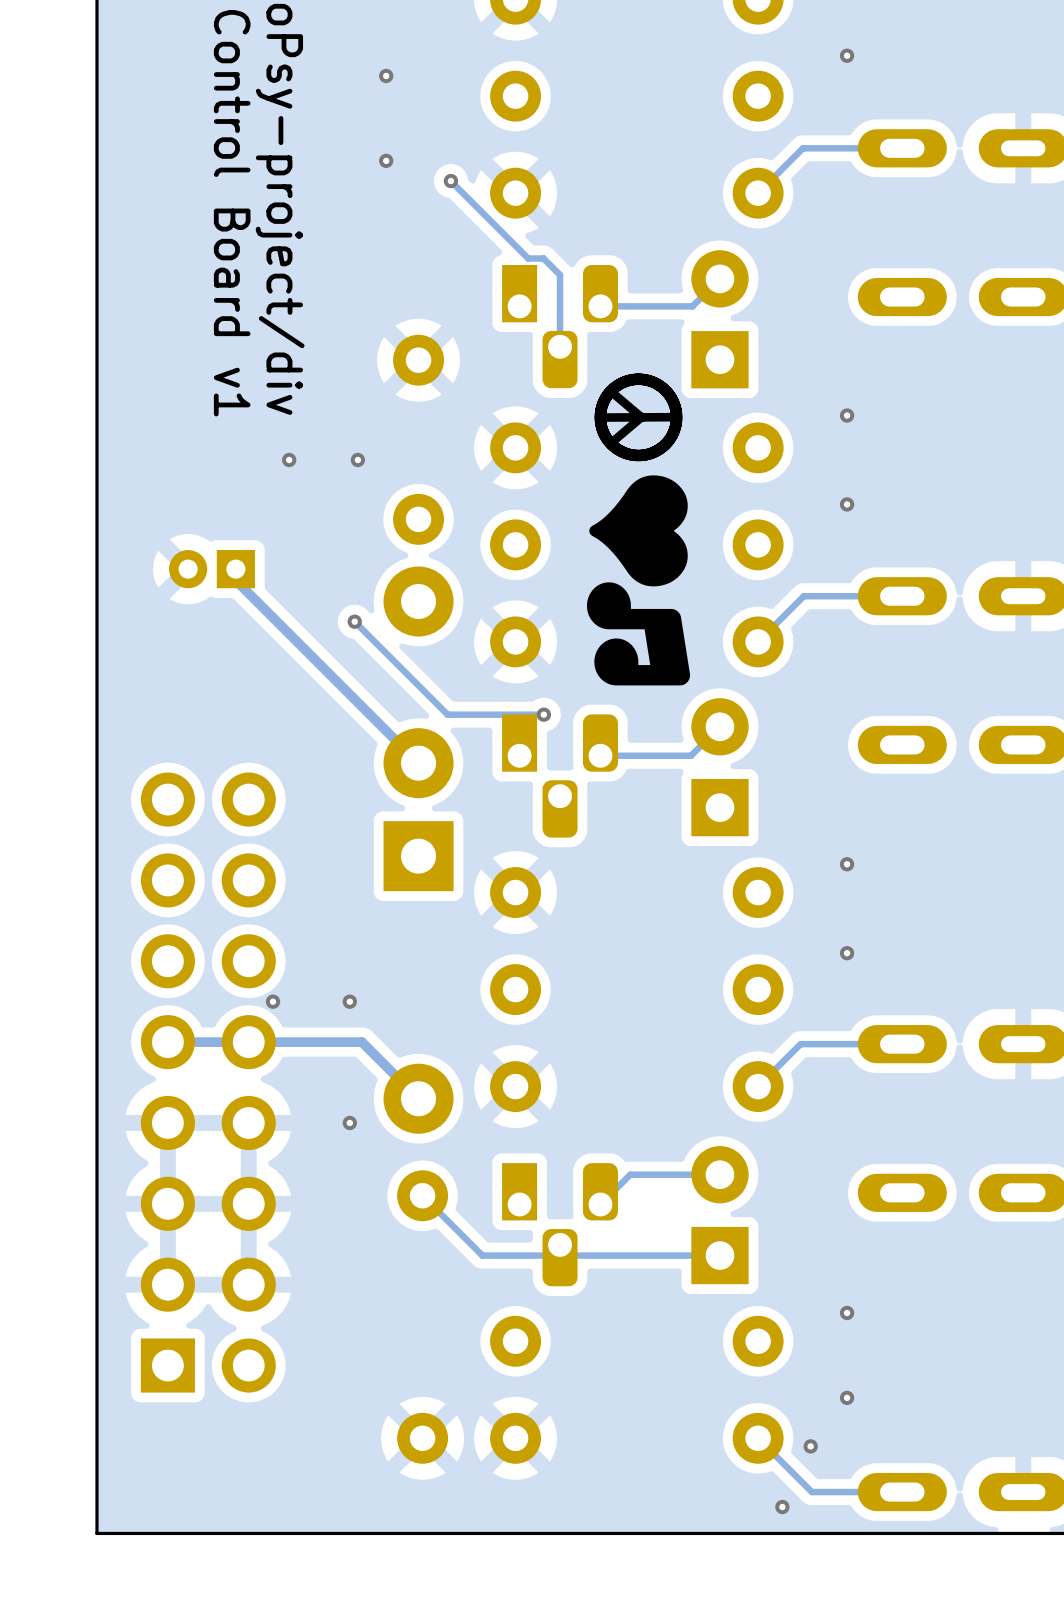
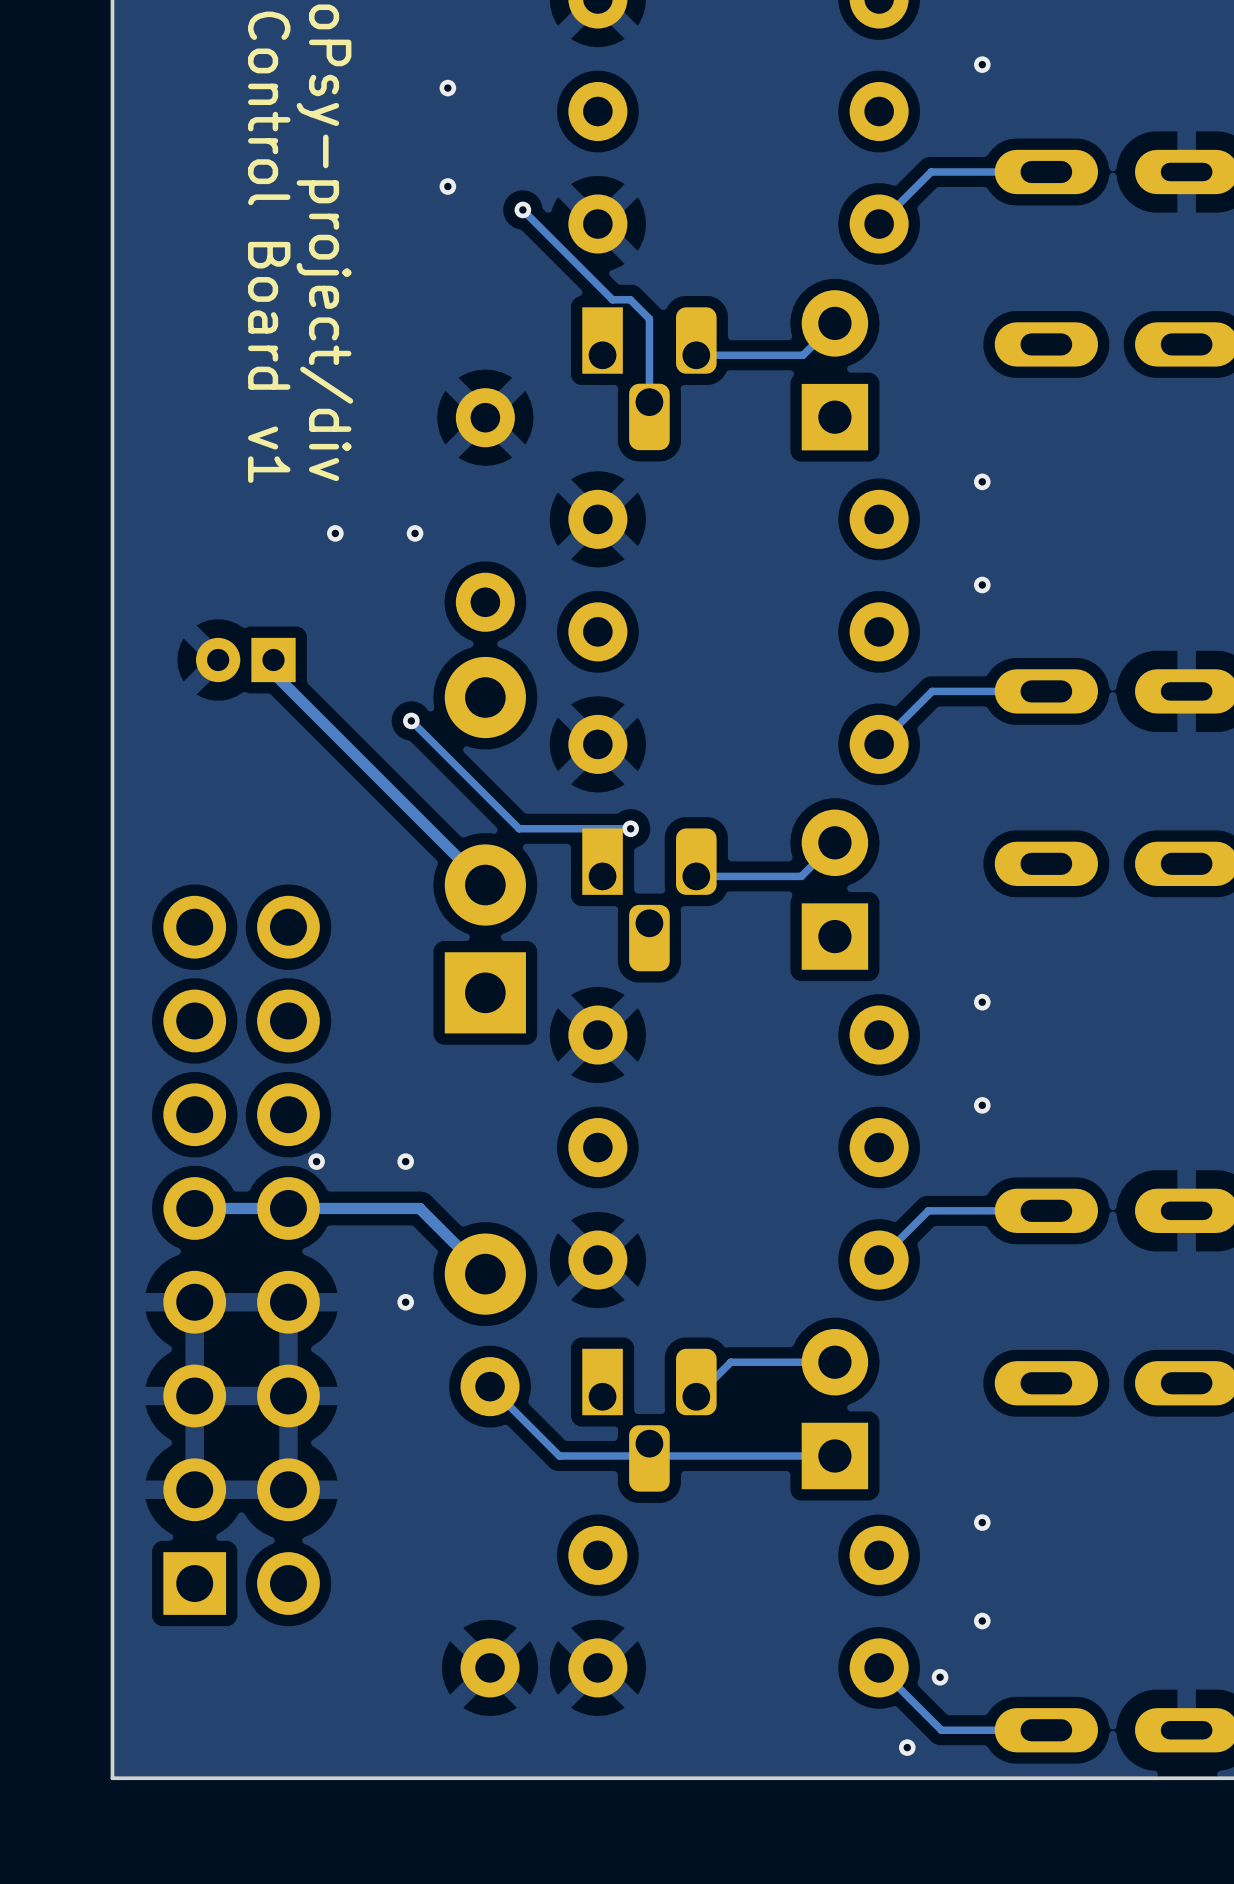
line: (640, 379) (655, 383) (666, 391) (674, 404) (676, 419) (672, 433) (664, 445) (651, 453) (636, 455) (621, 451) (610, 443) (602, 430) (600, 415) (604, 400) (612, 389) (625, 381) (640, 379) -> none
line: (612, 392) (641, 417) -> none
line: (641, 416) (612, 441) -> none
line: (673, 417) (603, 417) -> none
drawing: [586, 475, 691, 686] -> none

